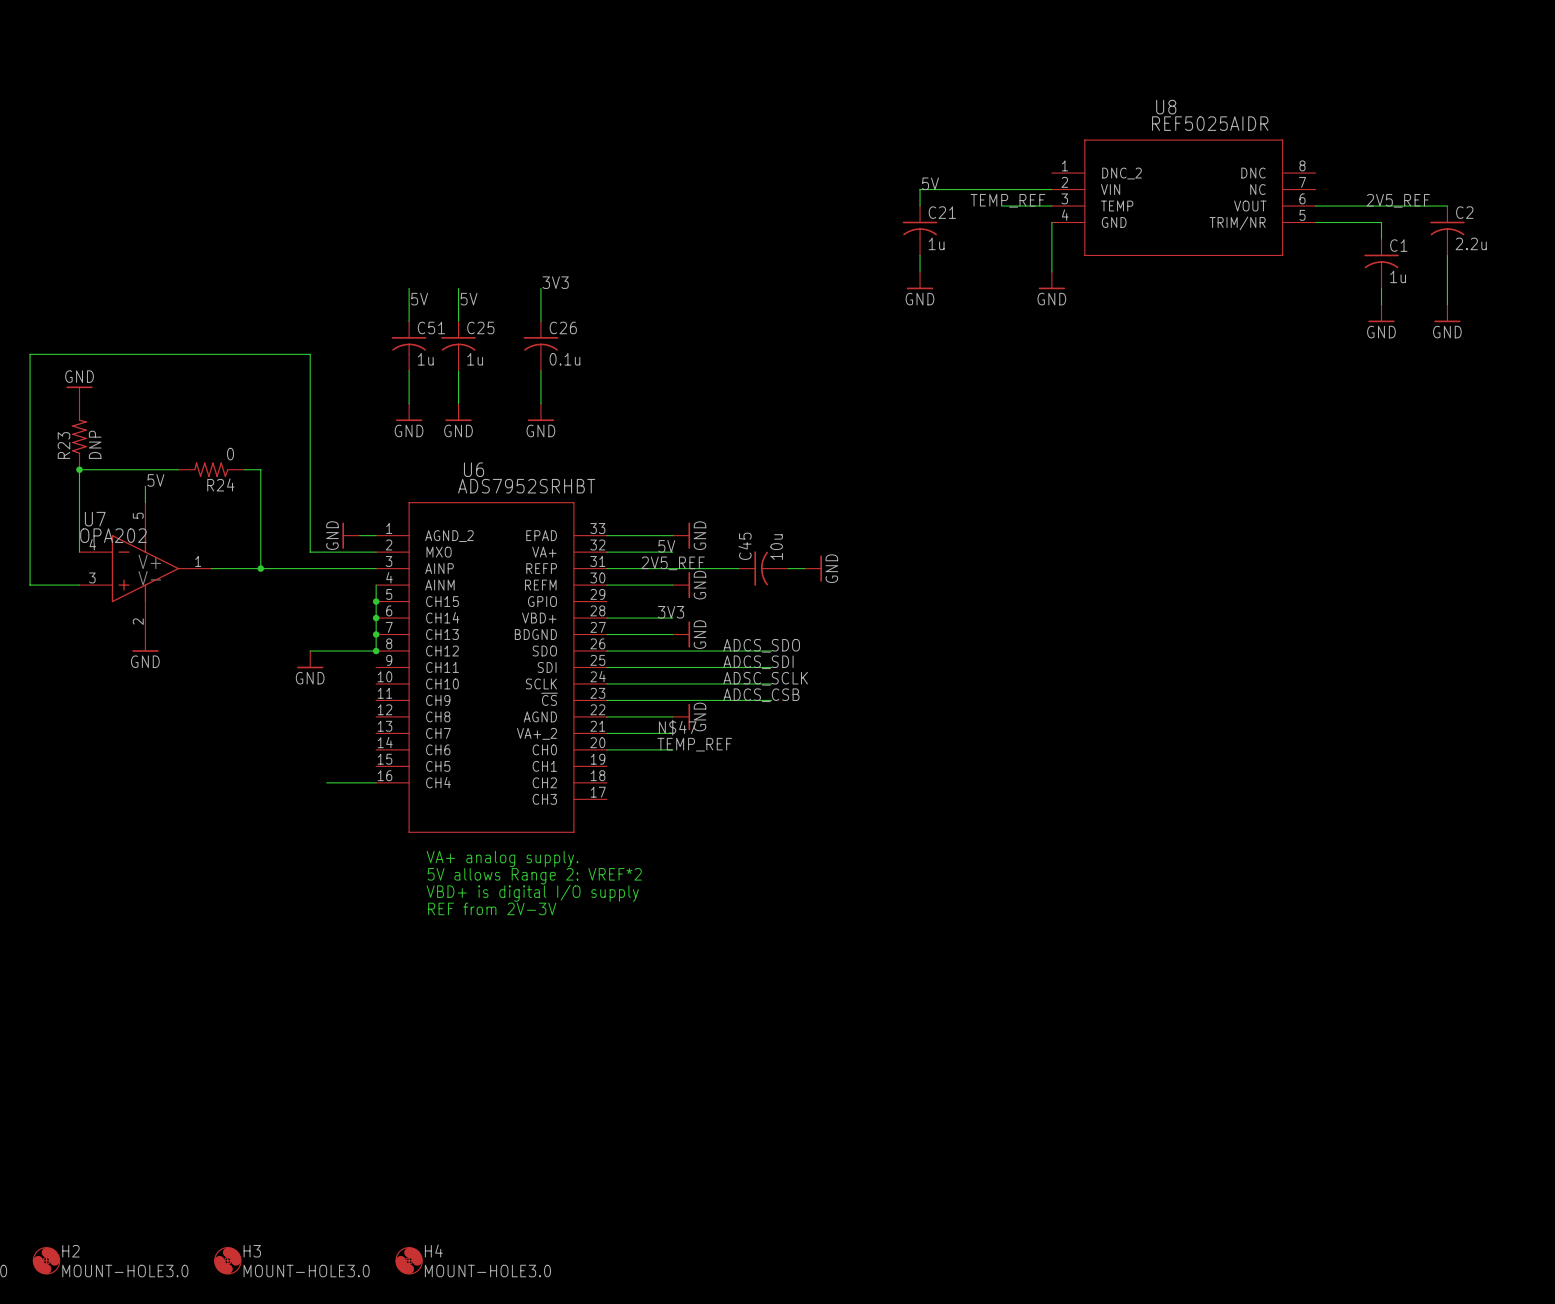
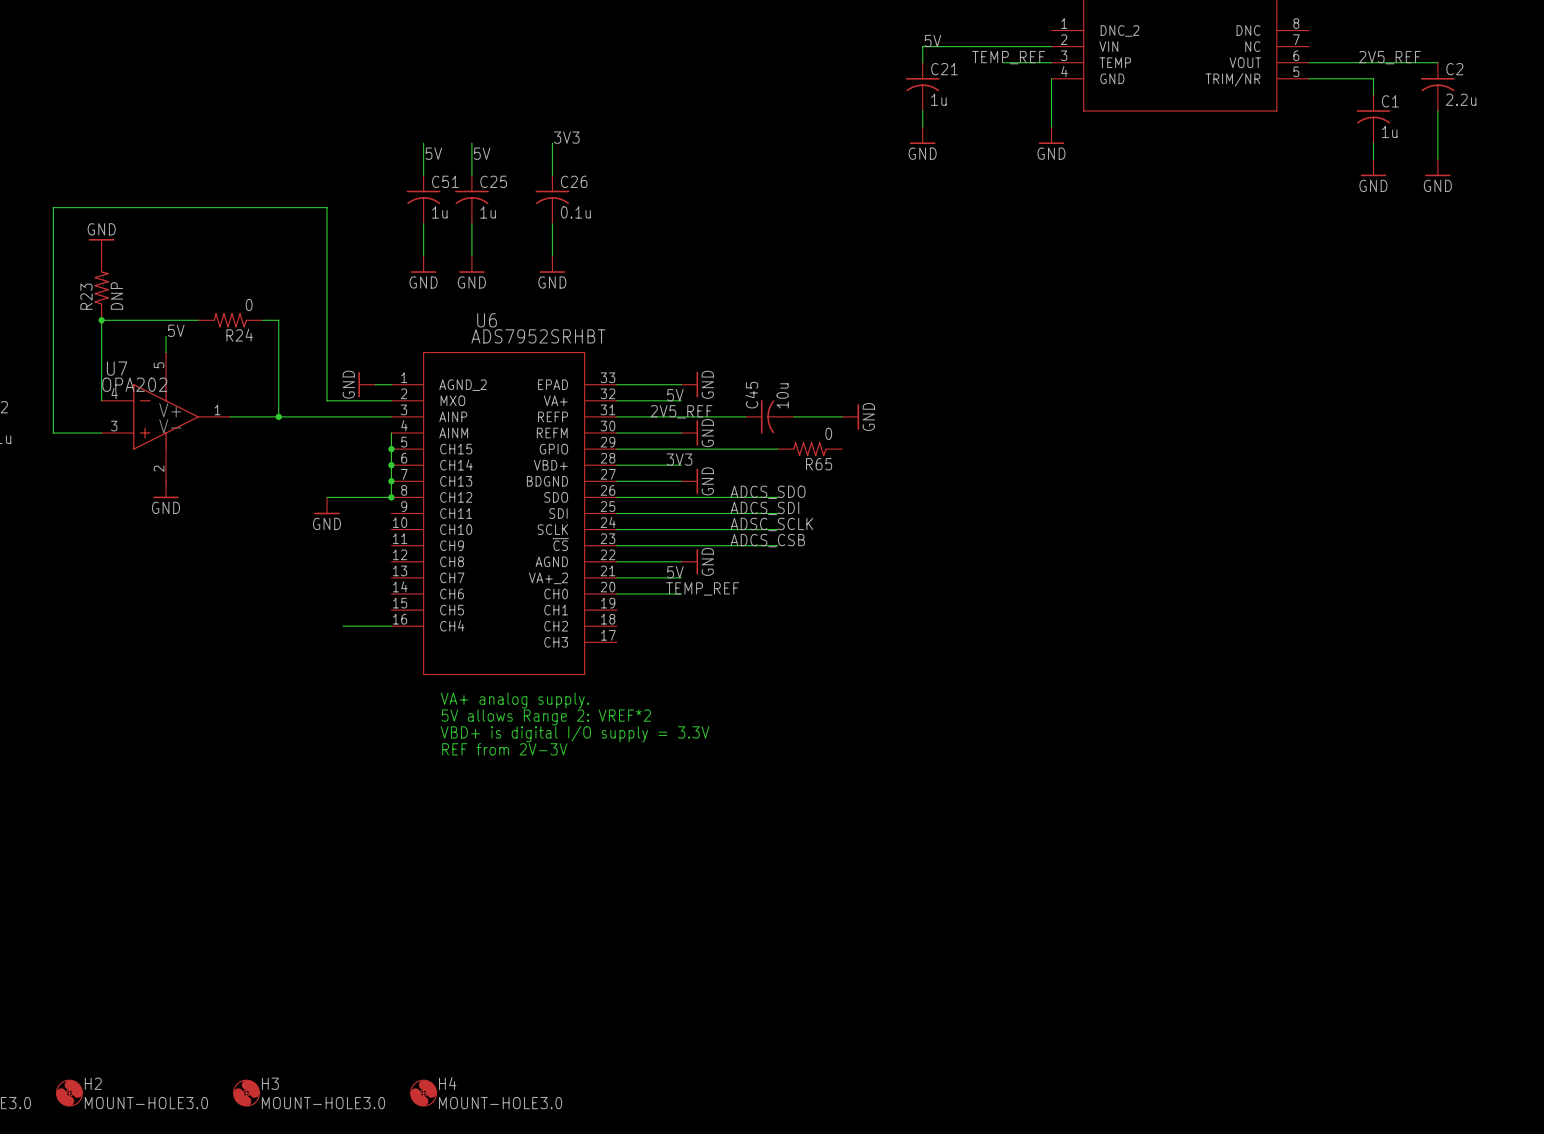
power symbol position: GND (813, 568) -> GND (850, 416)
wire: none -> (616, 449) (777, 449)
R65: none -> 0 (810, 449)
label: N$47 (677, 727) -> 5V (675, 572)
text: VBD+ is digital I/O supply (532, 893) -> VBD+ is digital I/O supply = 3.3V (575, 734)

